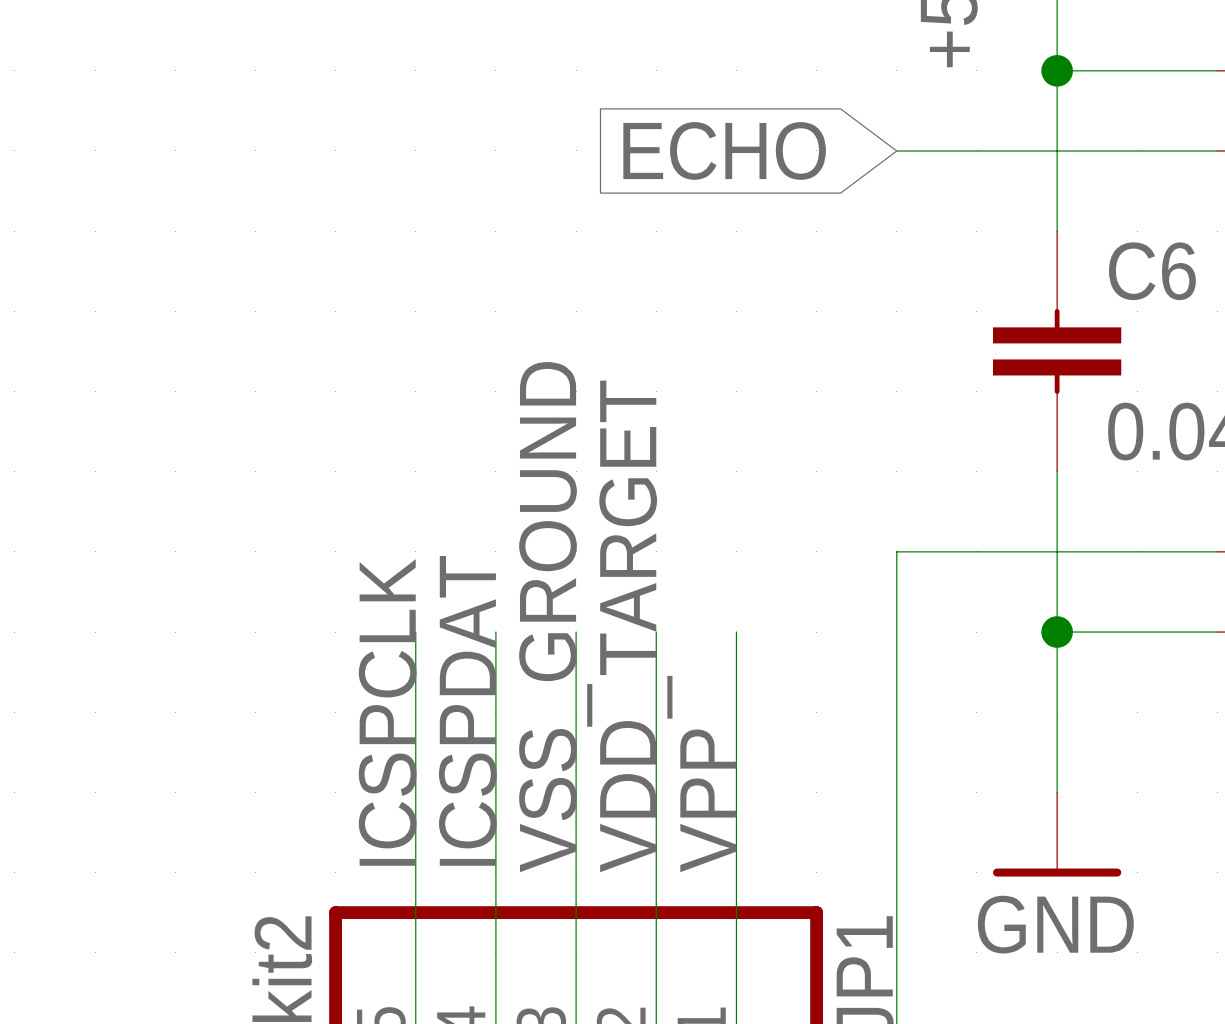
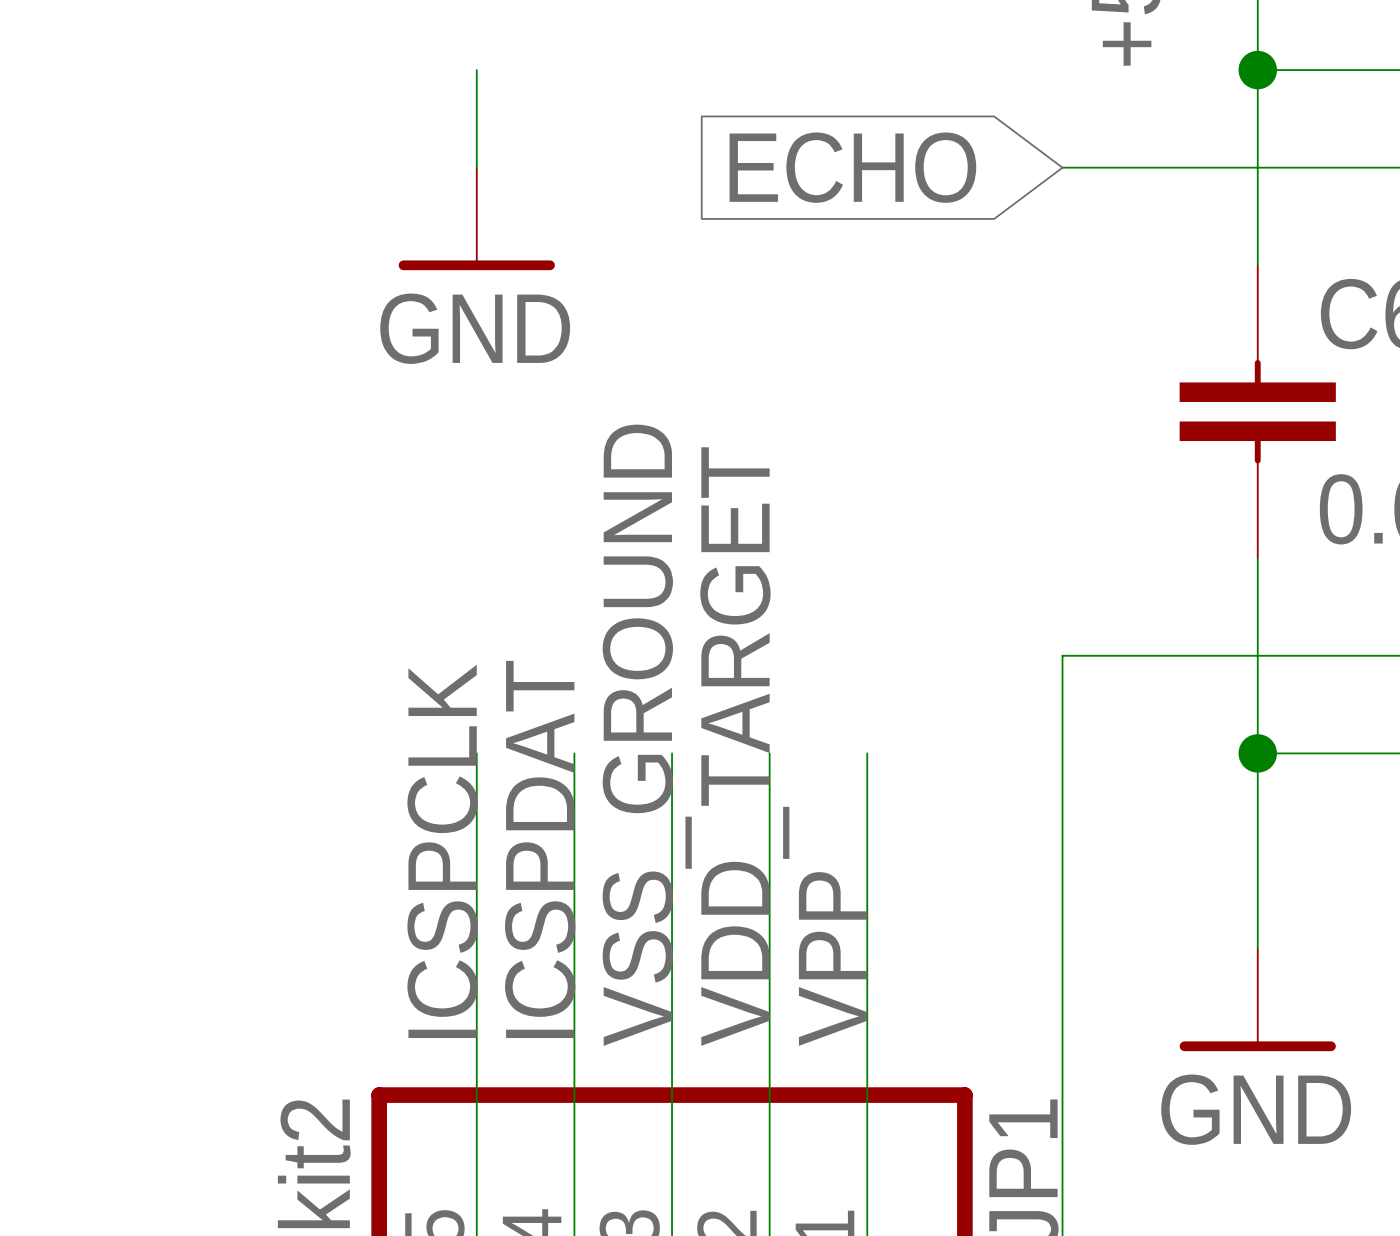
wire: none -> (476, 70) (476, 167)
power symbol: none -> GND (476, 218)

